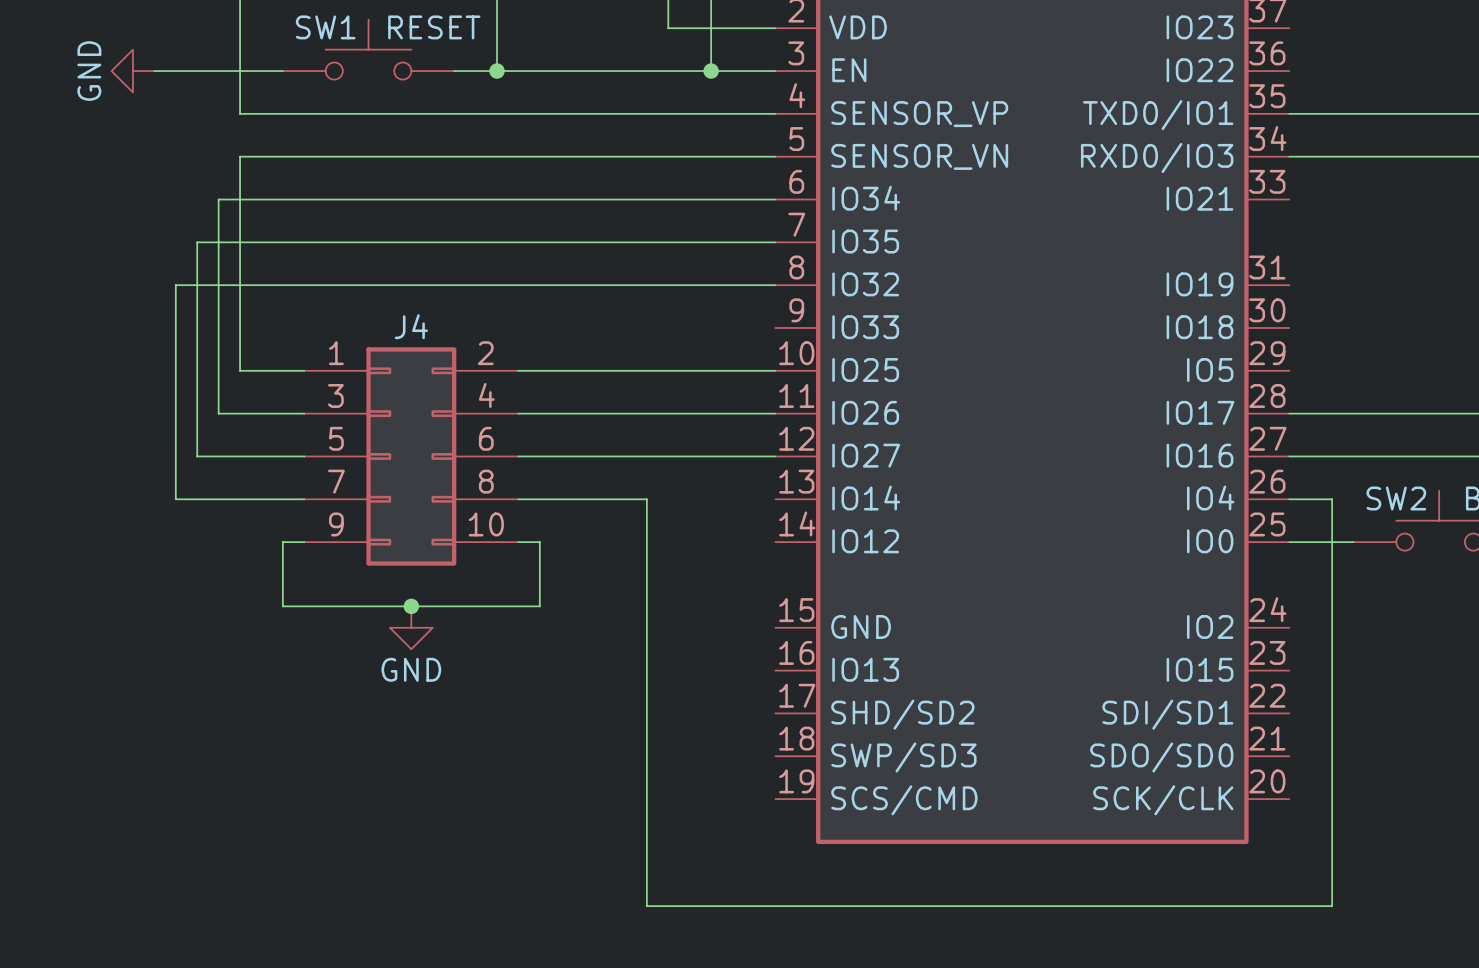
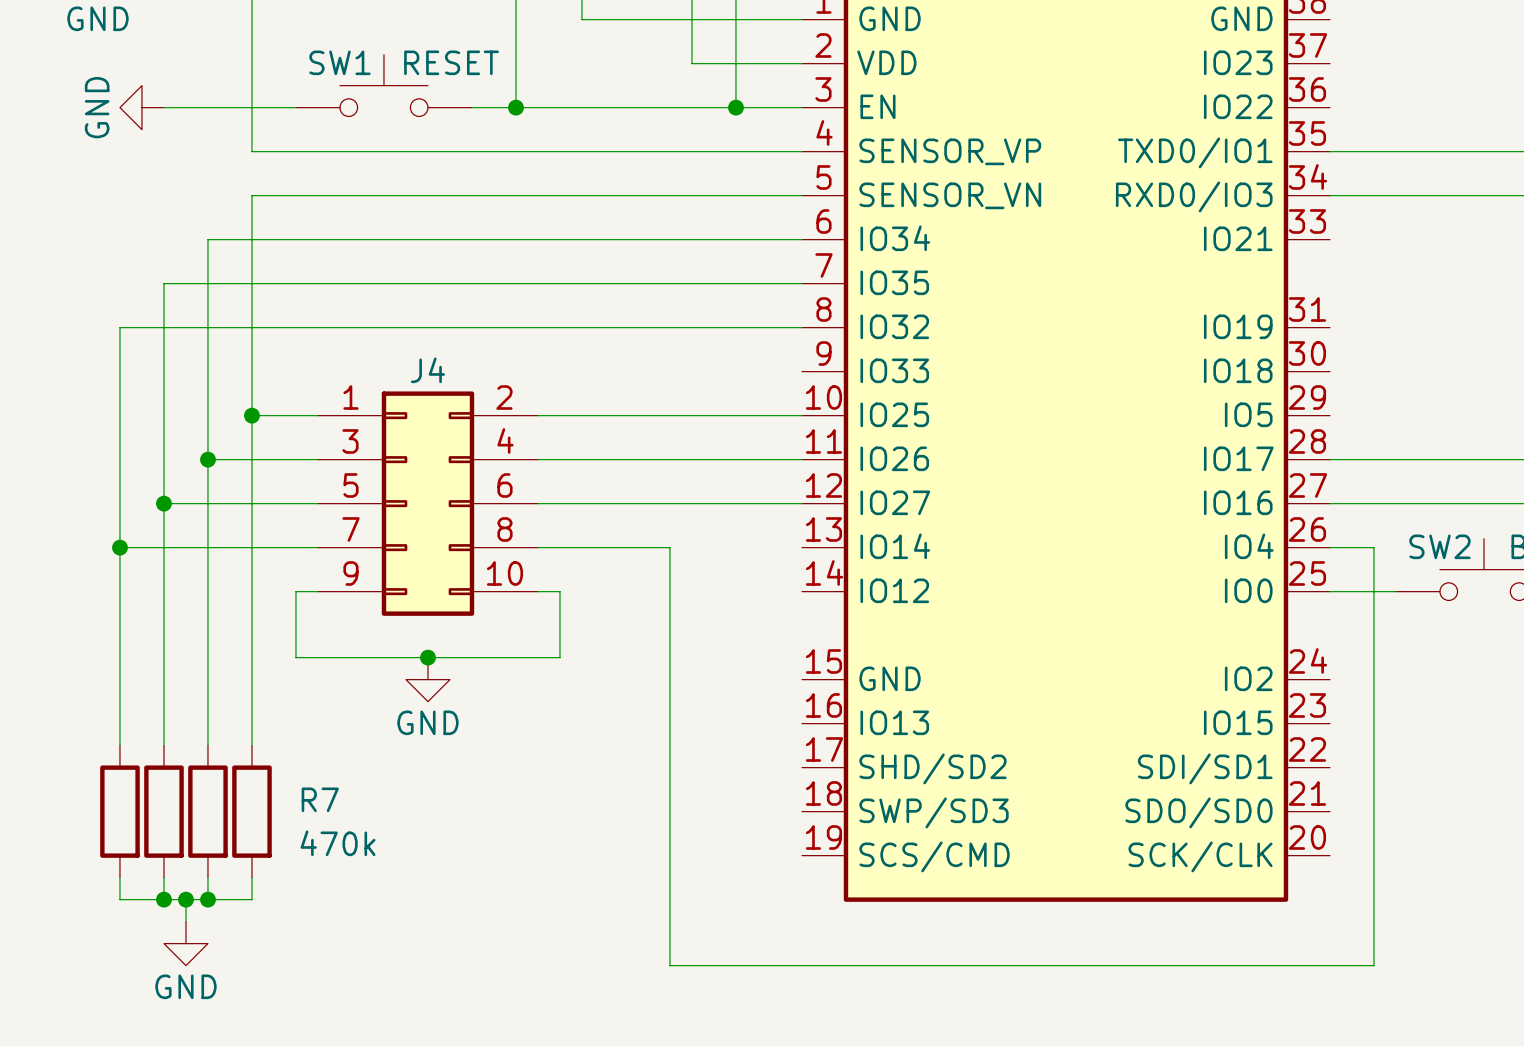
wire: (218, 199) (218, 413) -> (207, 459) (229, 459)
wire: none -> (229, 239) (207, 239) (207, 283) (163, 283) (163, 745)
wire: (175, 285) (175, 499) -> (185, 327) (119, 327) (119, 745)
wire: none -> (251, 415) (251, 745)
junction: none -> (251, 415)
junction: none -> (207, 459)
wire: none -> (163, 503) (207, 503) (207, 745)
junction: none -> (163, 503)
wire: none -> (119, 547) (185, 547)
junction: none -> (119, 547)
part: none -> (119, 811)
part: none -> (163, 811)
part: none -> (207, 811)
R7: none -> 470k (251, 811)
wire: none -> (119, 877) (119, 899) (251, 899) (251, 877)
wire: none -> (163, 877) (163, 899)
wire: none -> (207, 877) (207, 899)
junction: none -> (163, 899)
wire: none -> (185, 899) (185, 921)
junction: none -> (185, 899)
junction: none -> (207, 899)
power symbol: none -> GND (185, 943)

